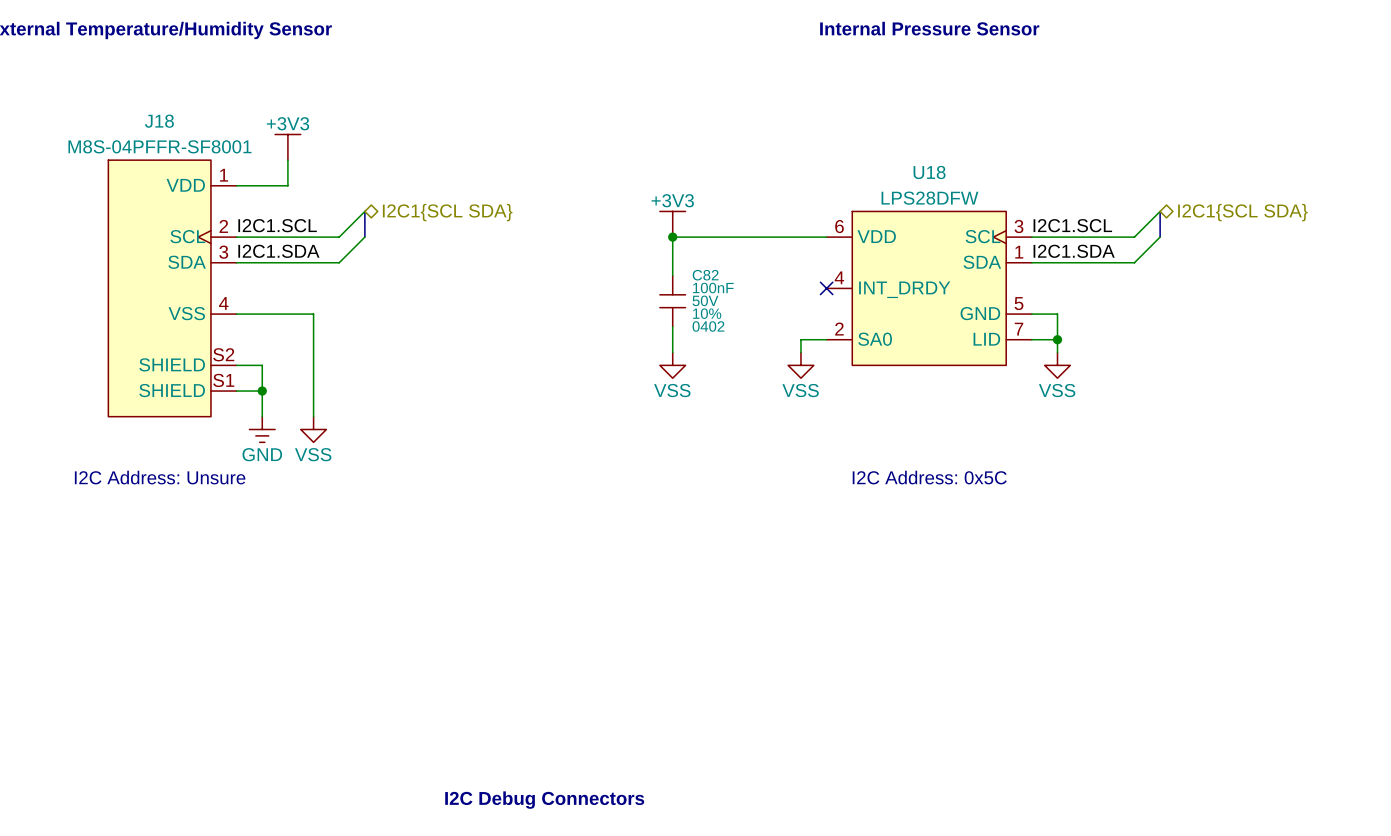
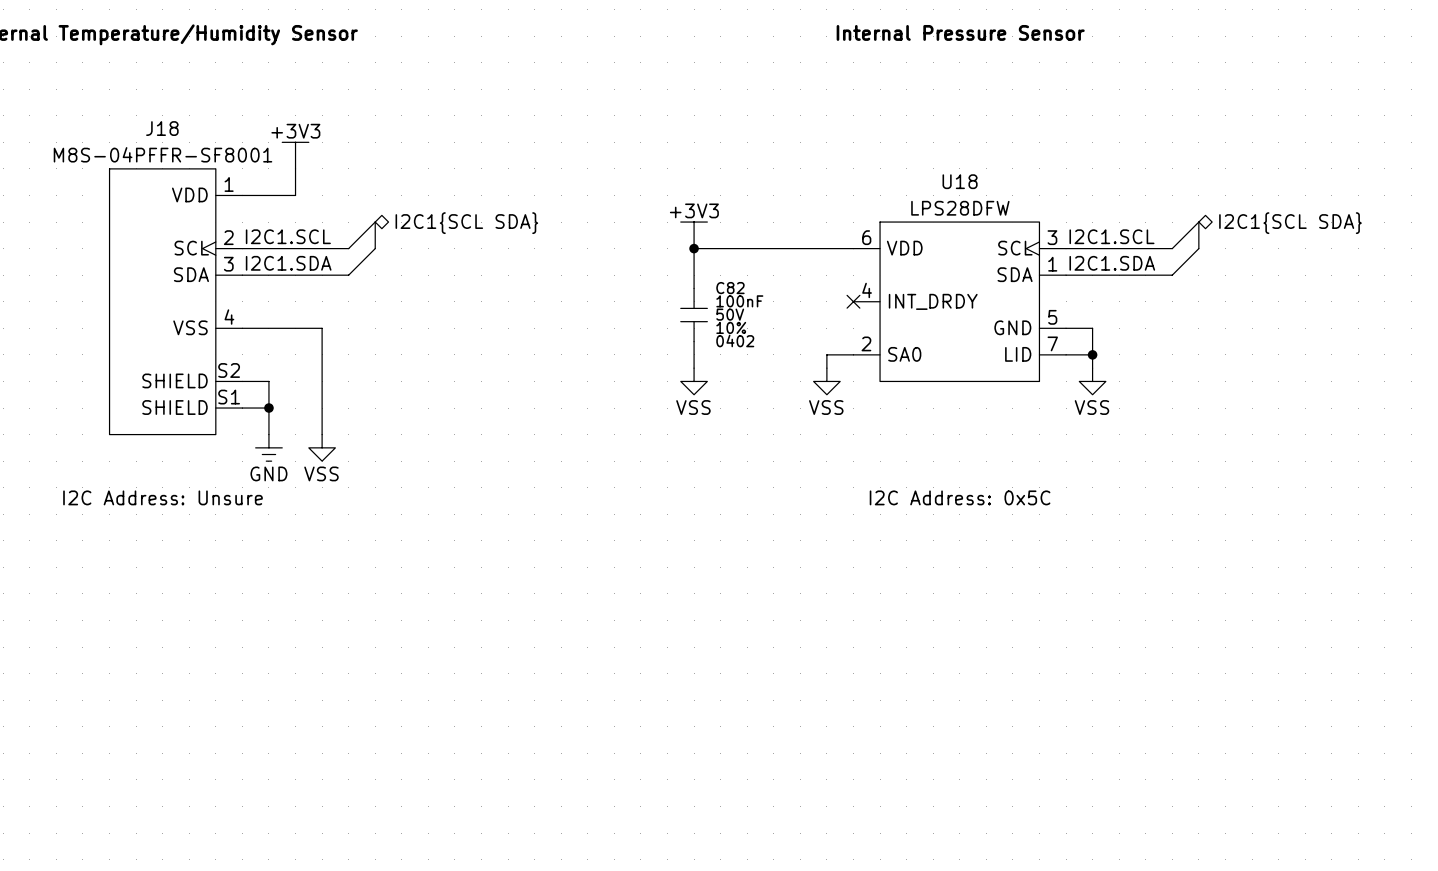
text: I2C Debug Connectors (544, 800) -> none

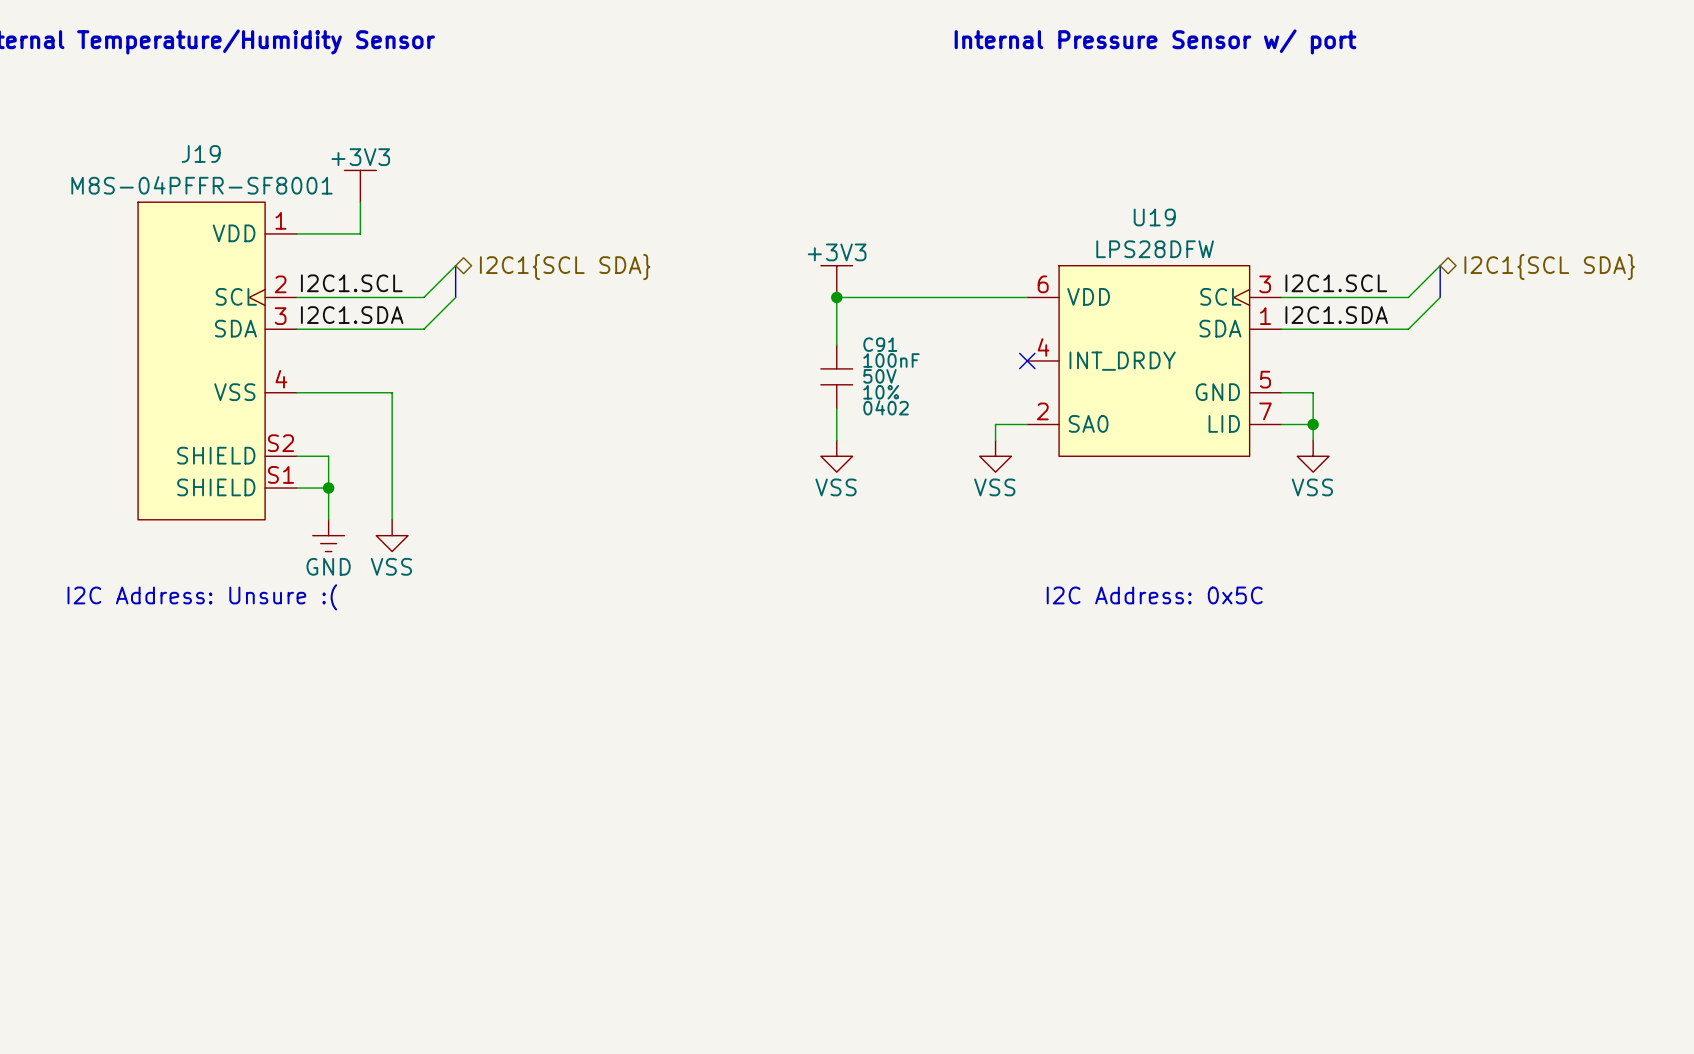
text: Internal Pressure Sensor (960, 32) -> Internal Pressure Sensor w/ port (1155, 41)
J18 name: J18 (162, 128) -> J19 (201, 153)
U18 name: U18 (960, 181) -> U19 (1154, 217)
C82 name: C82 (730, 288) -> C91 (880, 344)
text: I2C Address: Unsure (163, 497) -> I2C Address: Unsure :( (202, 597)

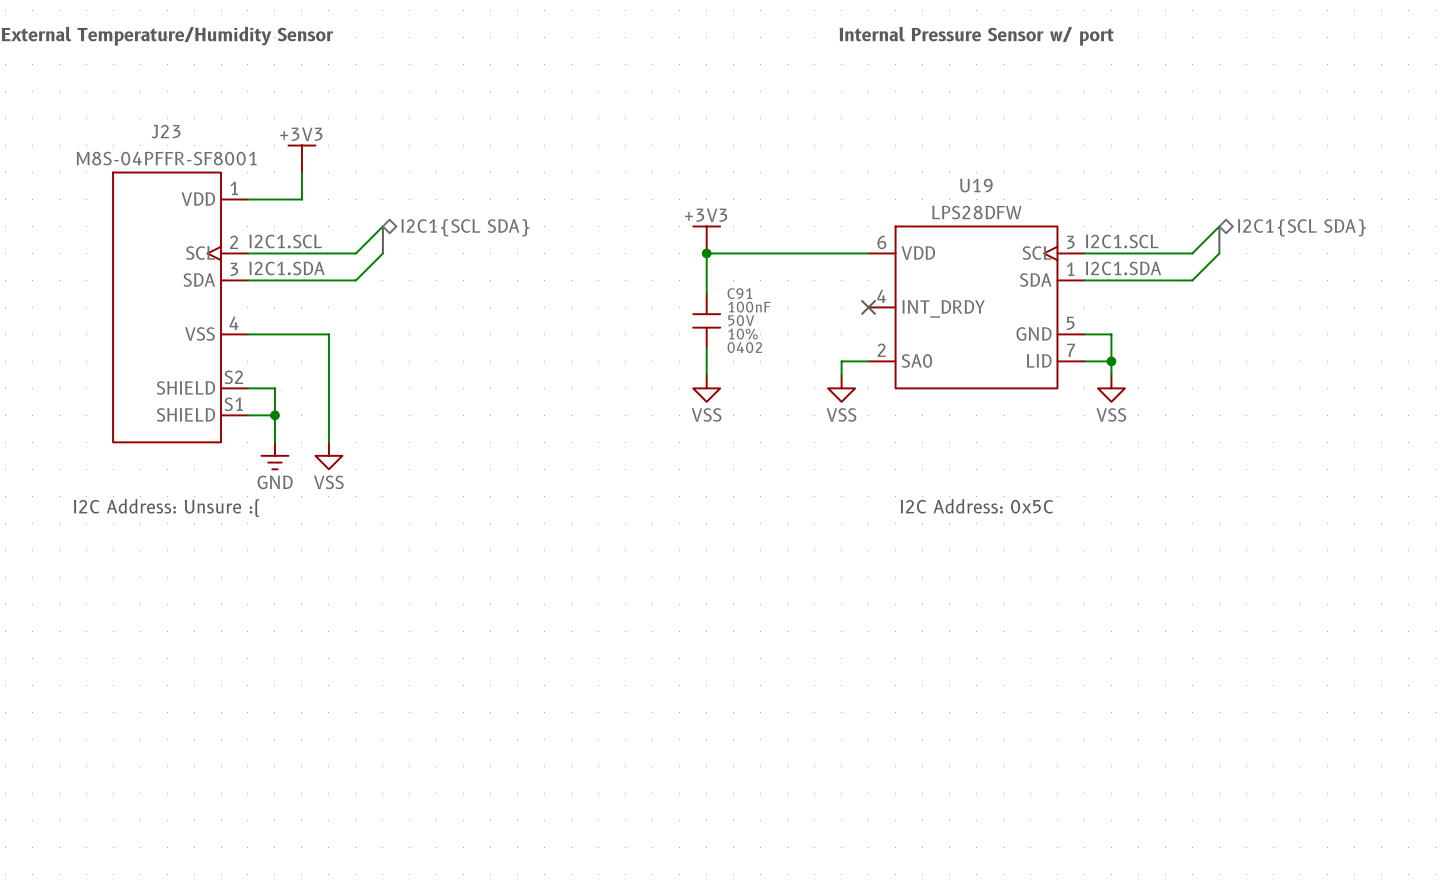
J19 name: J19 (201, 153) -> J23 (165, 131)

